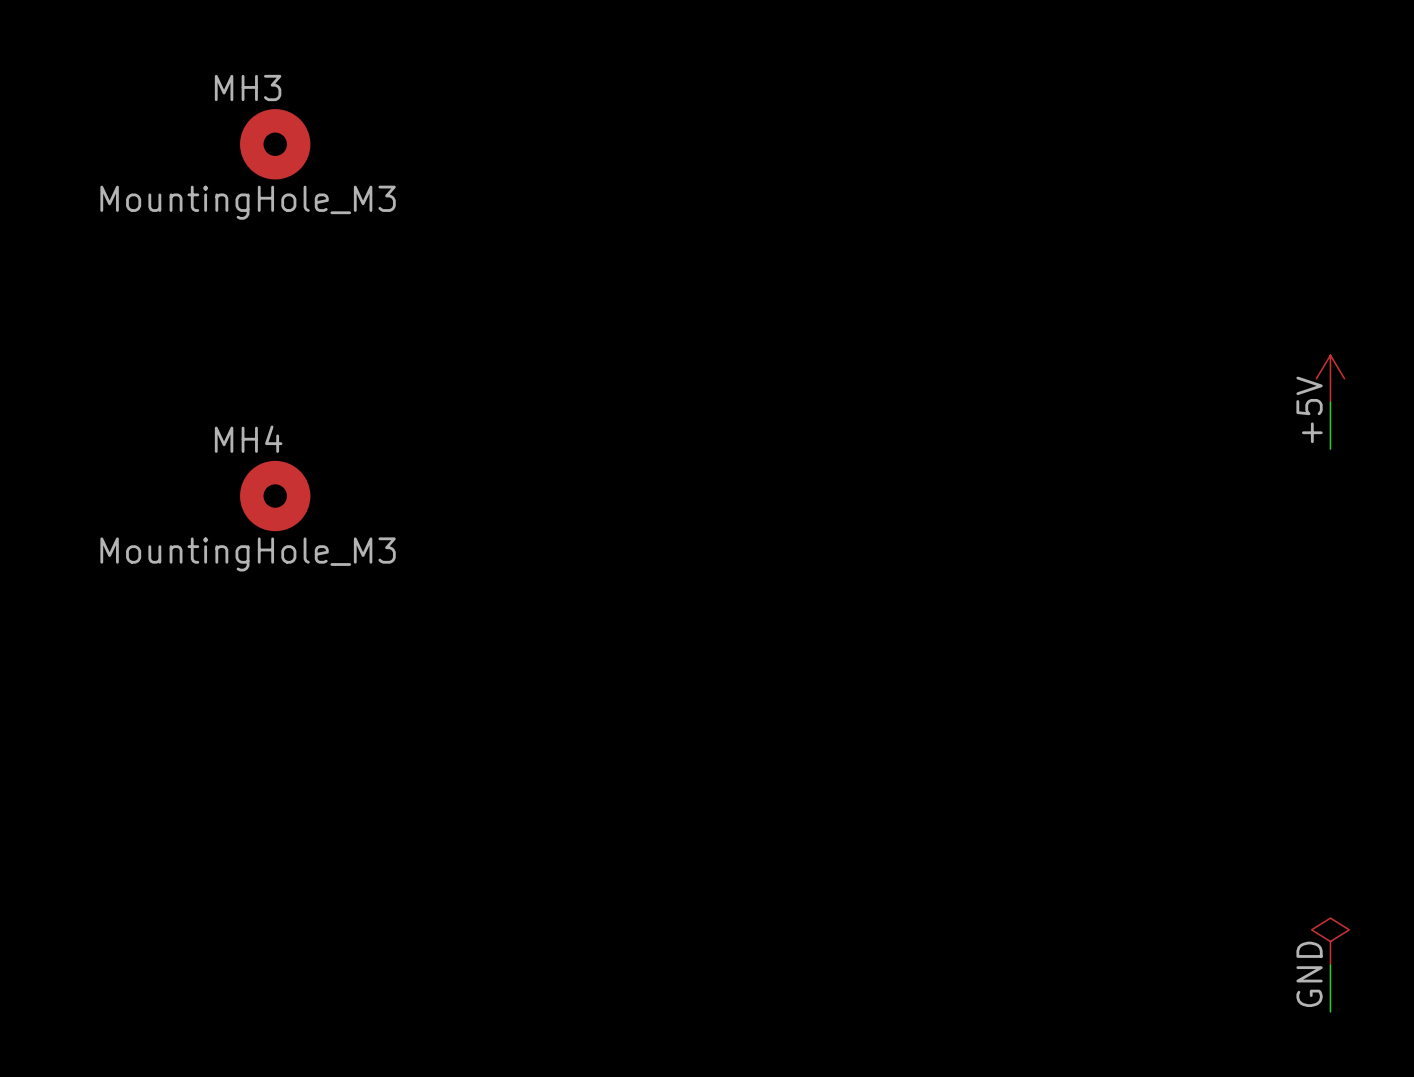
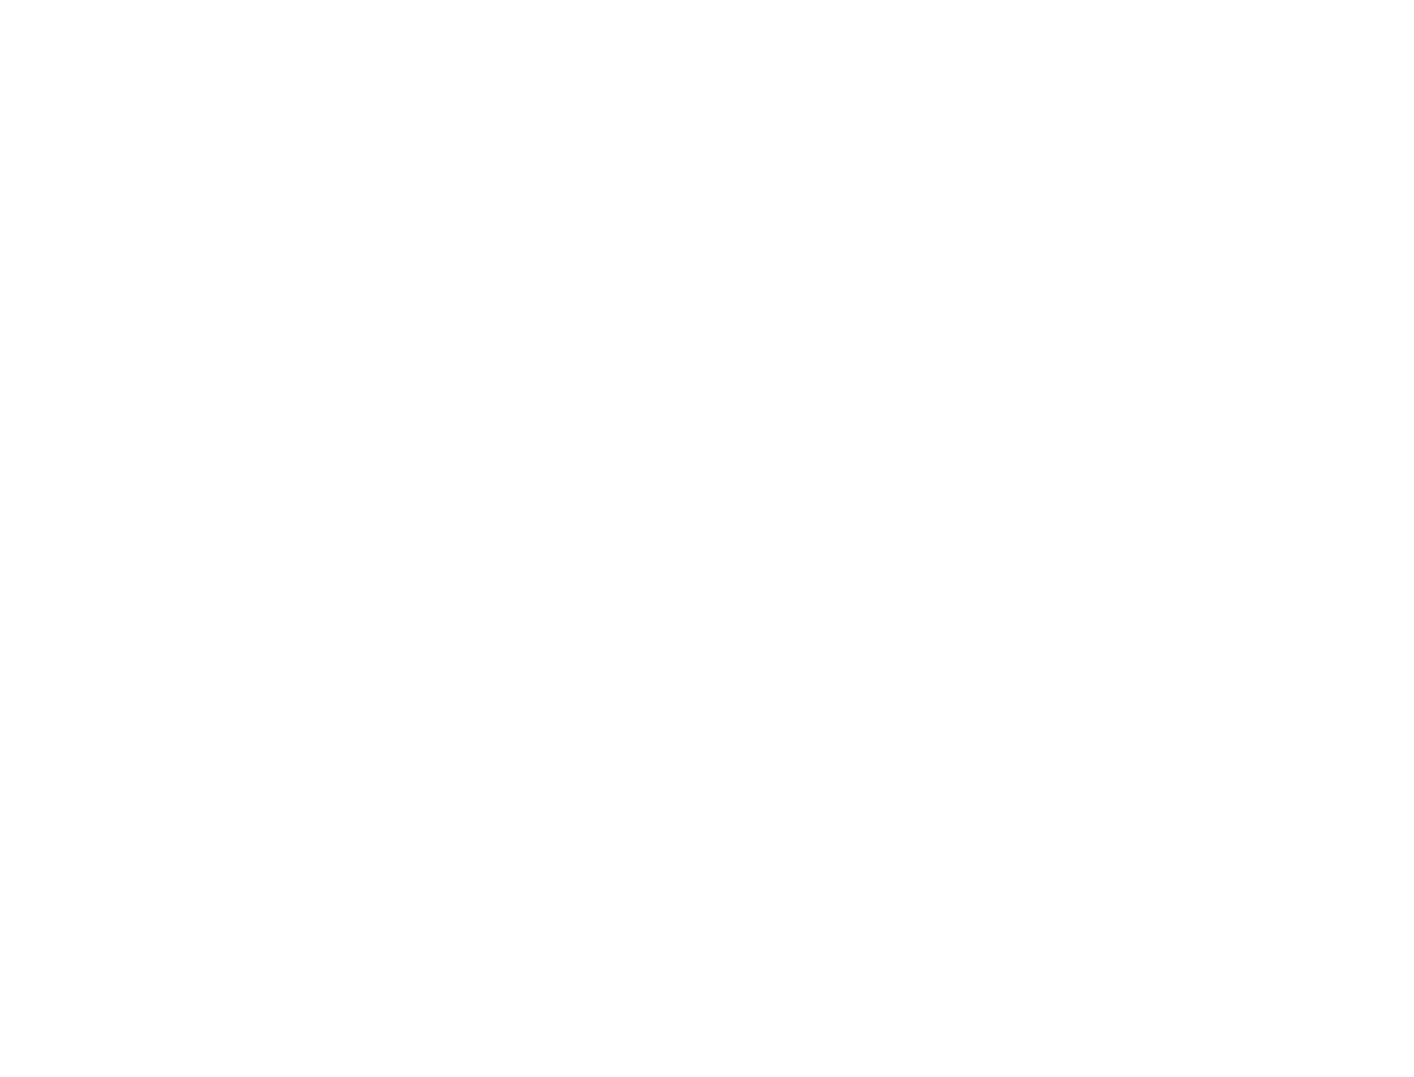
MH3: MountingHole_M3 (275, 144) -> none
power symbol: (1330, 378) -> none
wire: (1330, 402) (1330, 449) -> none
label: +5V (1309, 409) -> none
MH4: MountingHole_M3 (275, 496) -> none
power symbol: (1330, 941) -> none
wire: (1330, 965) (1330, 1011) -> none
label: GND (1309, 974) -> none

